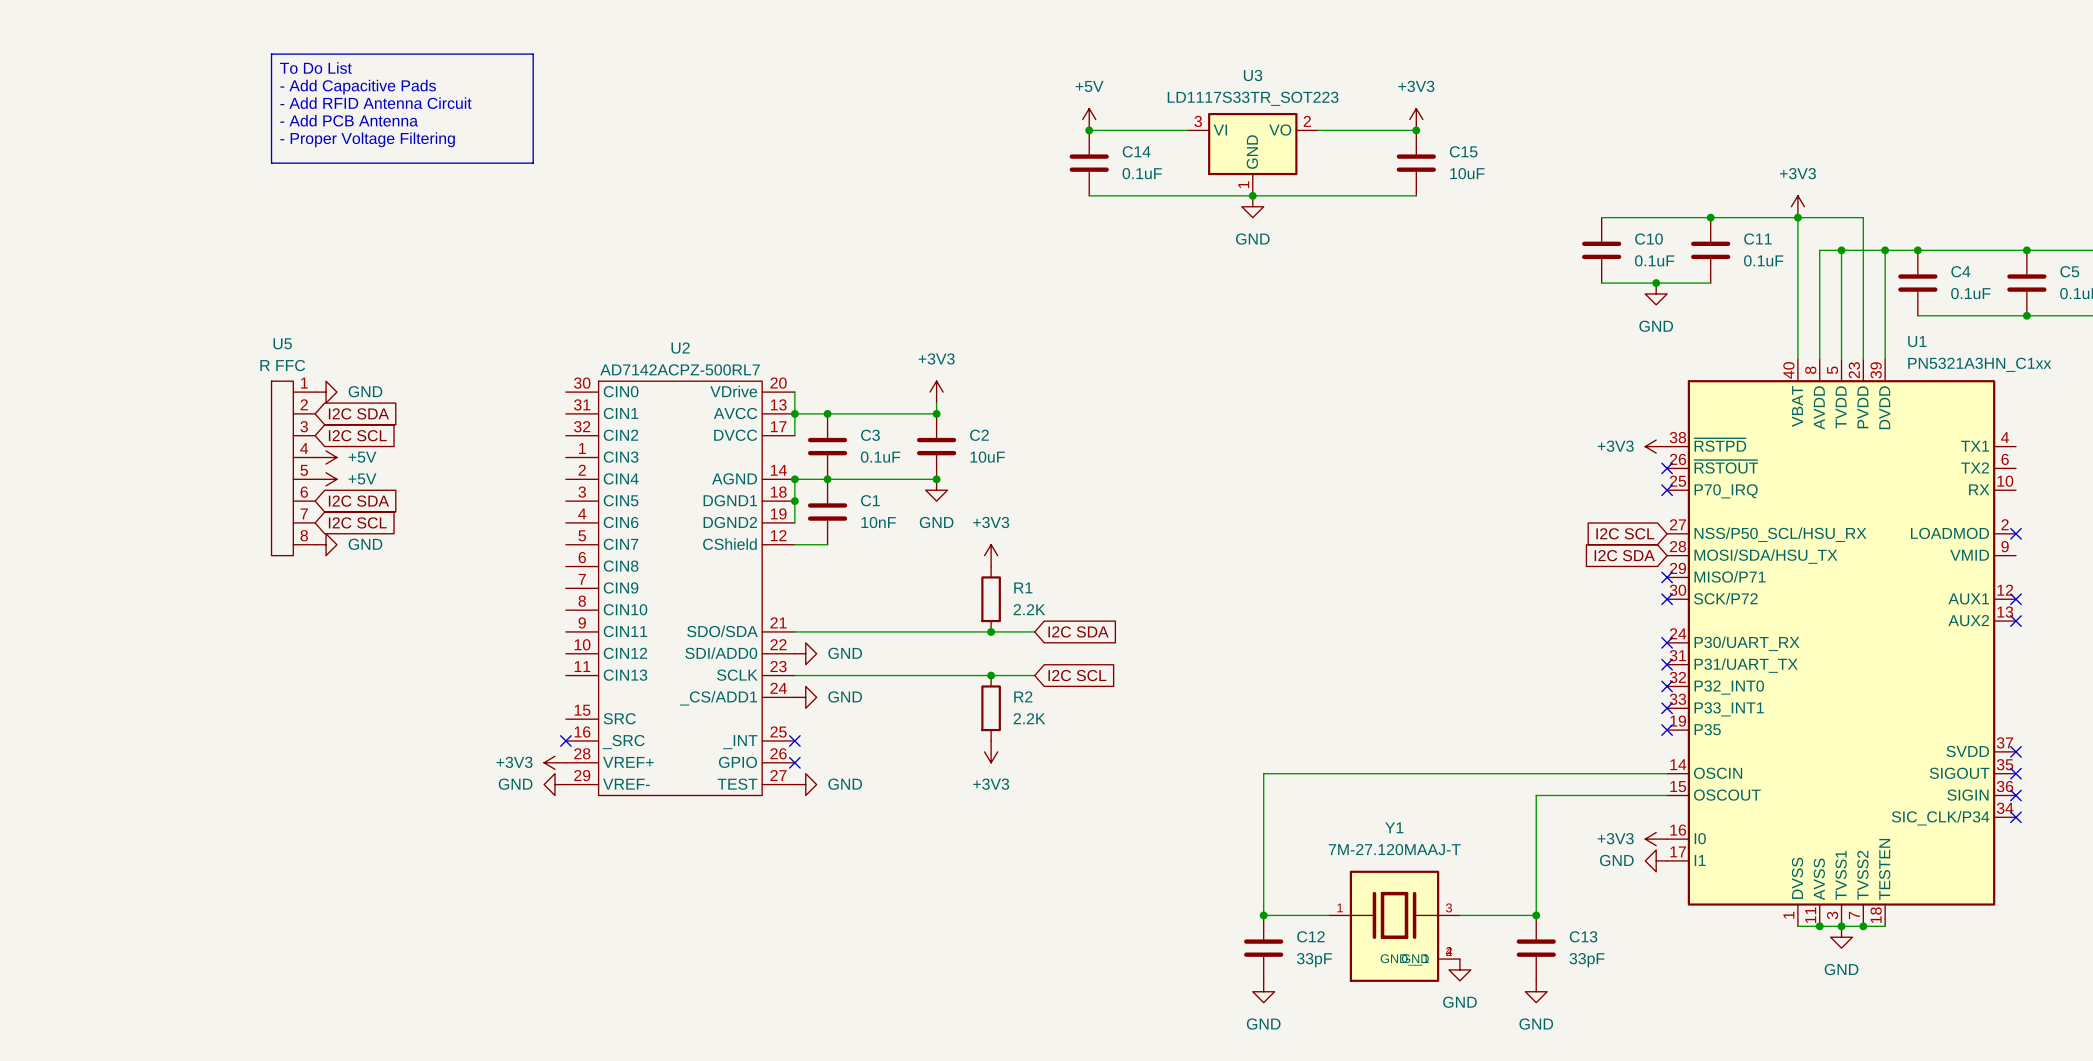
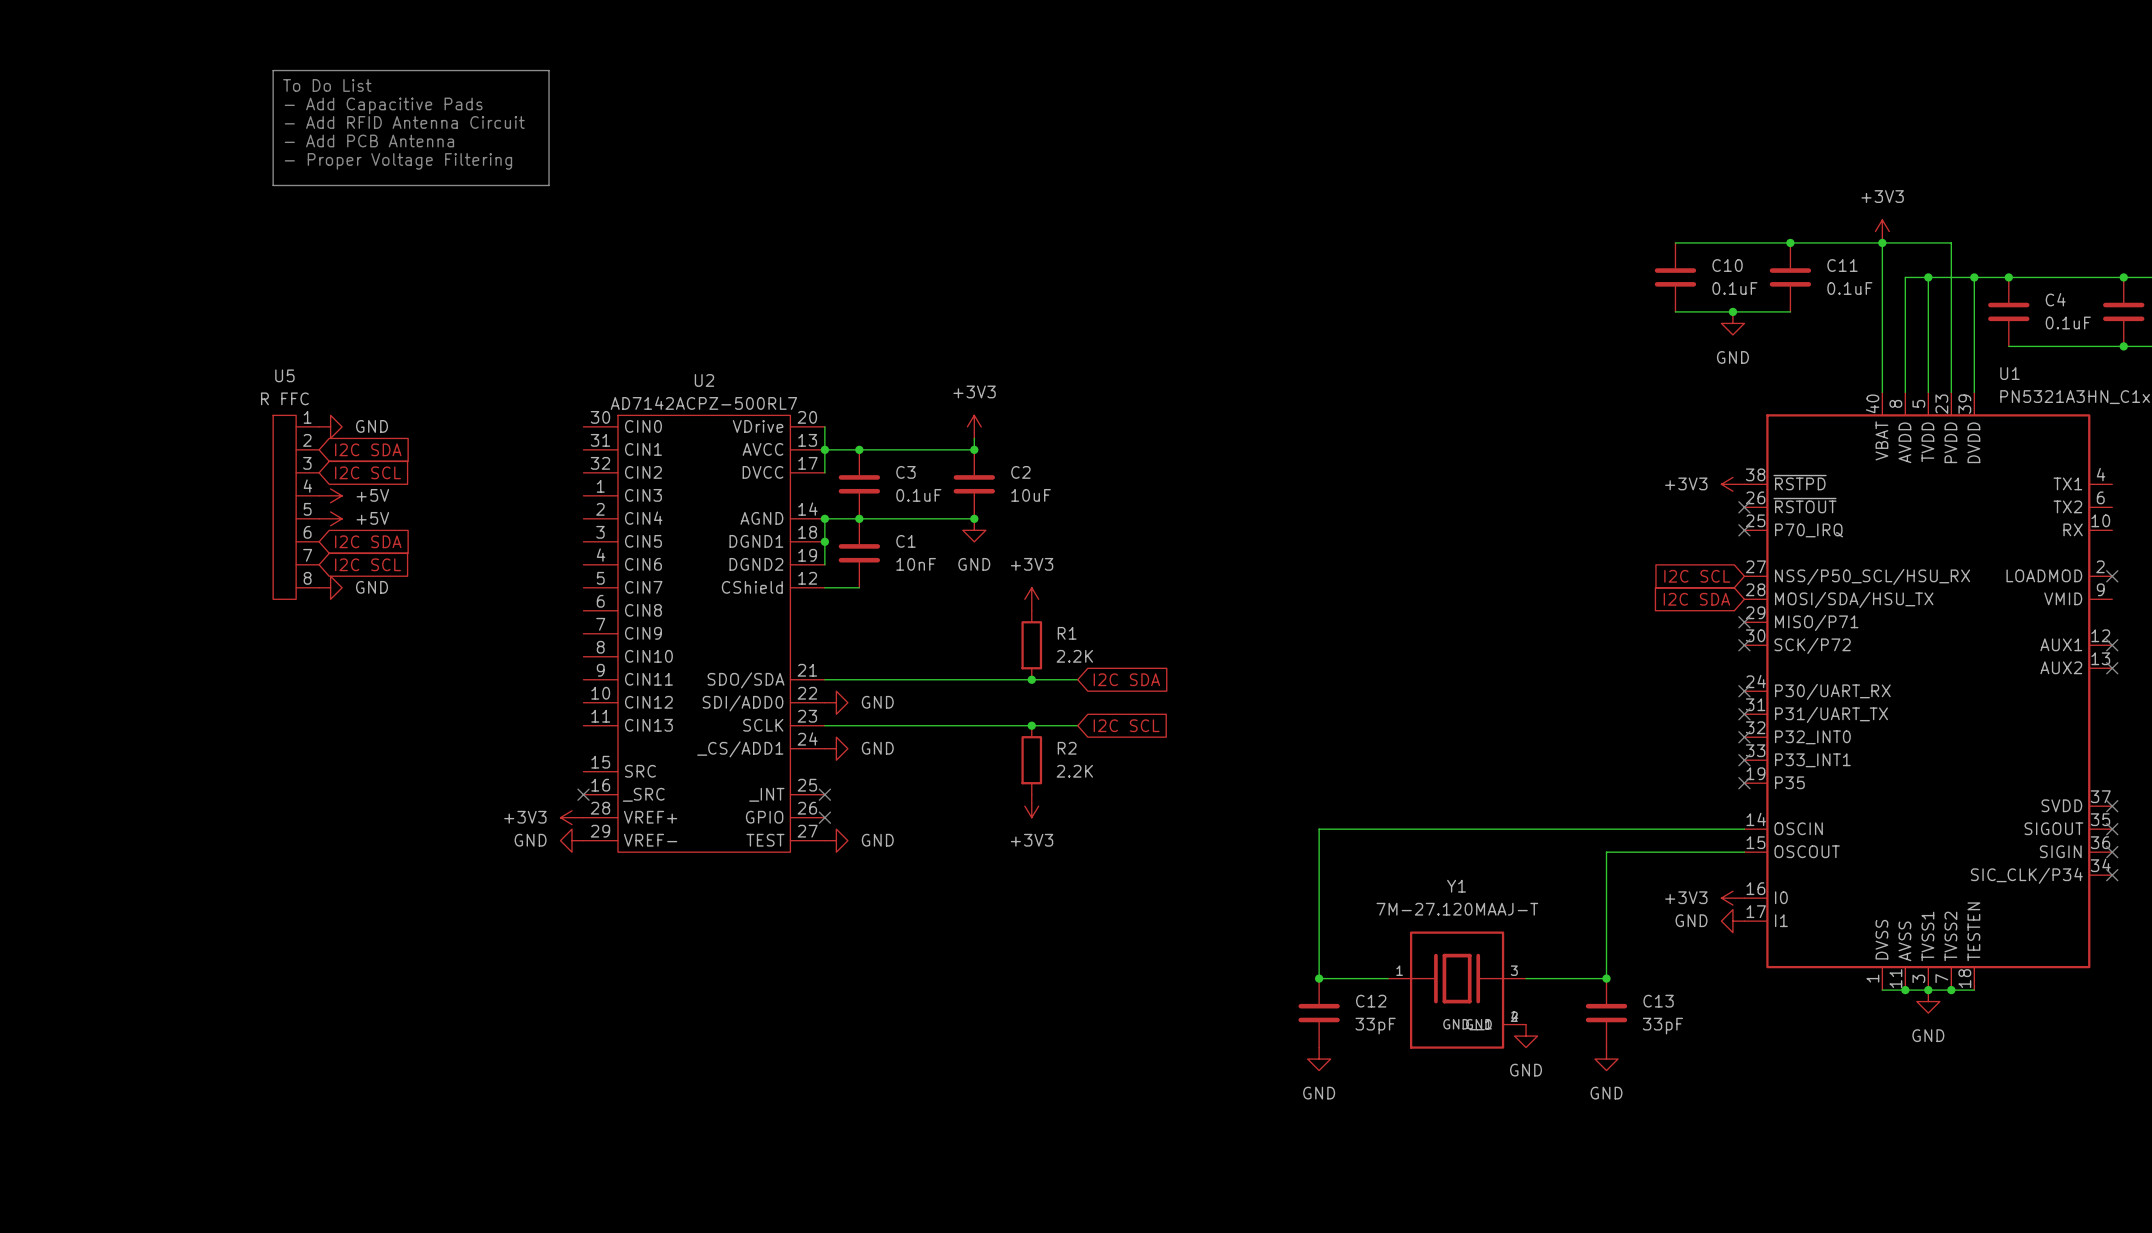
power symbol: +5V (1089, 119) -> none
power symbol: +3V3 (1416, 119) -> none
wire: (1089, 130) (1187, 130) -> none
junction: (1089, 130) -> none
wire: (1318, 130) (1416, 130) -> none
junction: (1416, 130) -> none
U3: LD1117S33TR_SOT223 (1252, 154) -> none
C14: 0.1uF (1089, 163) -> none
C15: 10uF (1416, 163) -> none
wire: (1089, 195) (1416, 195) -> none
junction: (1252, 195) -> none
power symbol: GND (1252, 206) -> none

